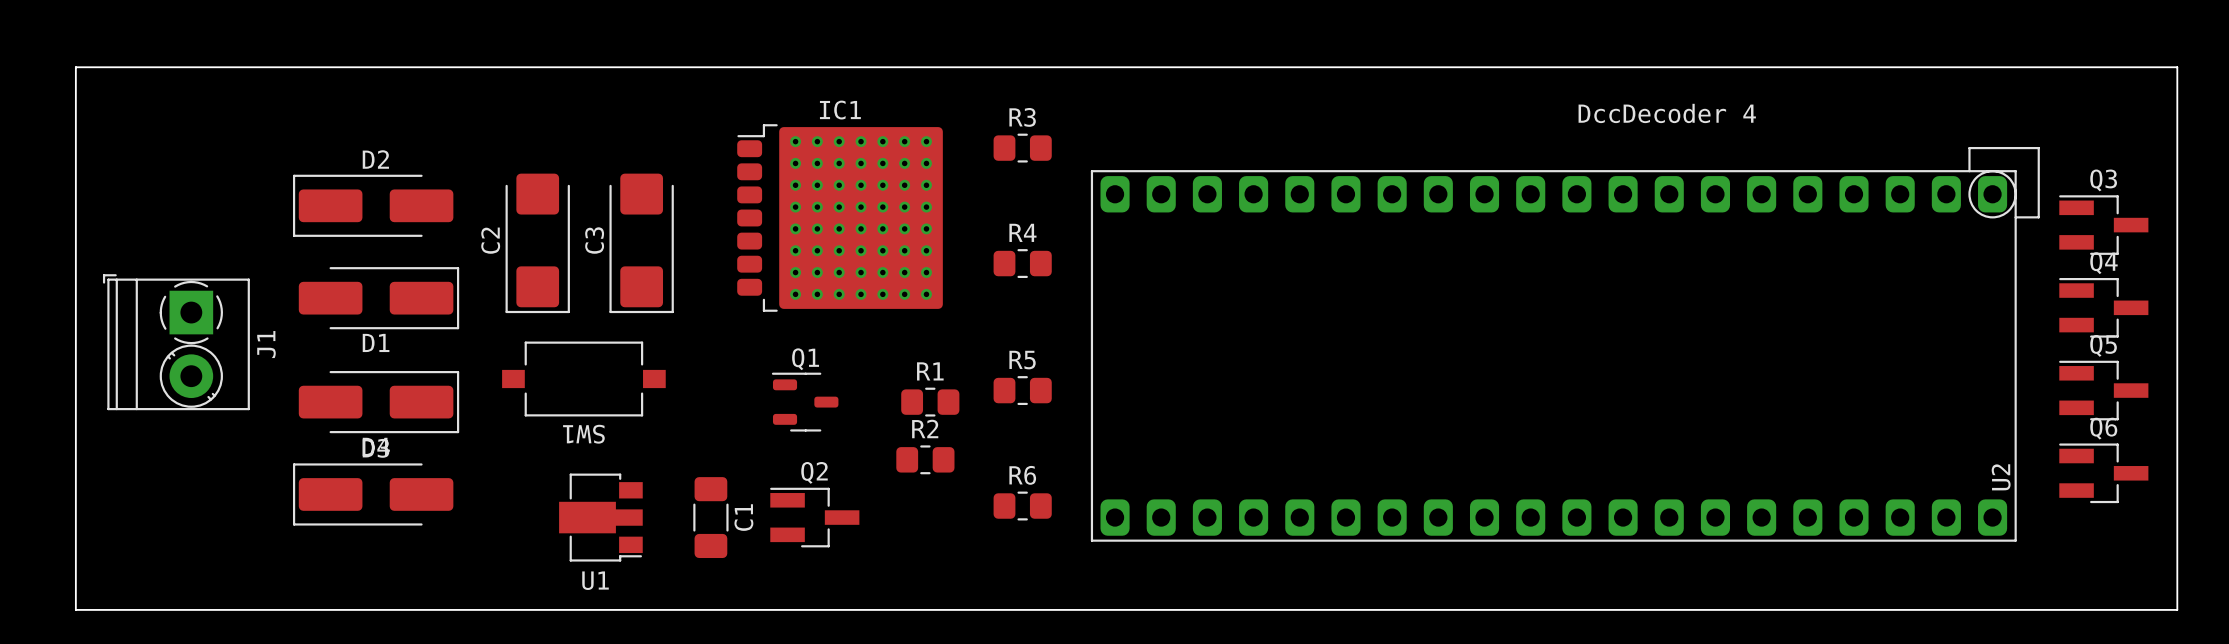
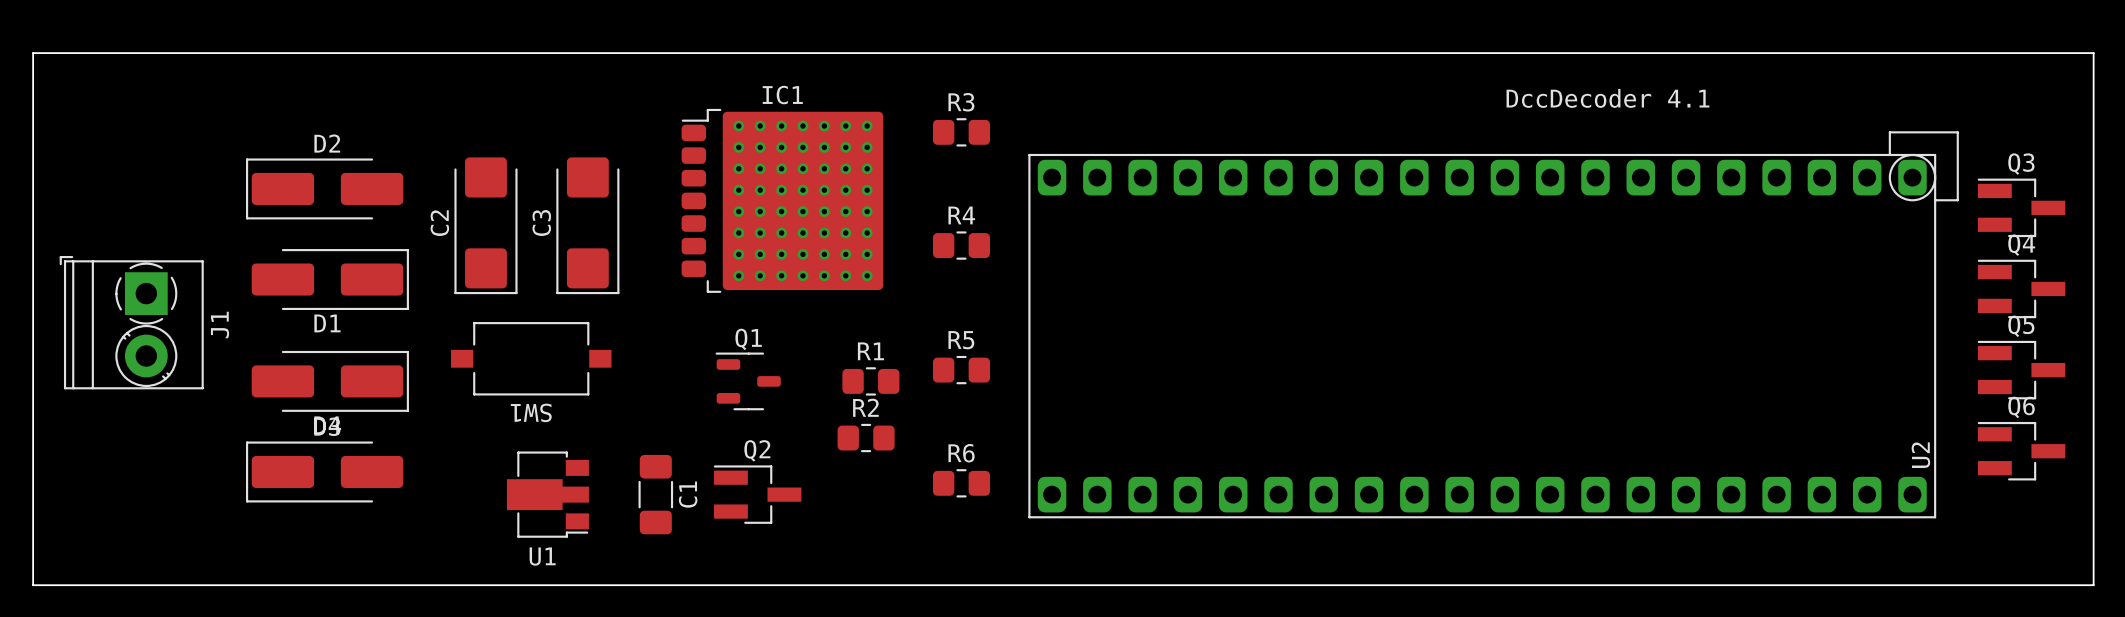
text: DccDecoder 4 (1667, 113) -> DccDecoder 4.1 (1607, 98)

